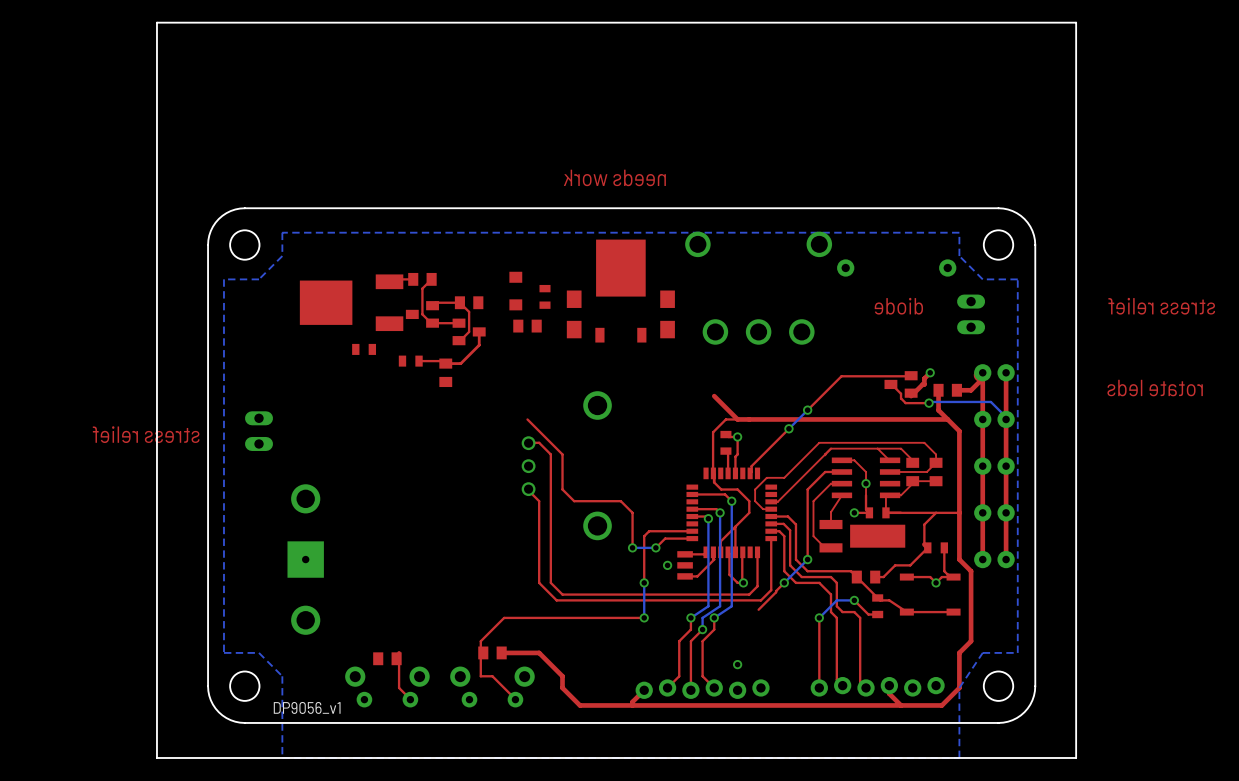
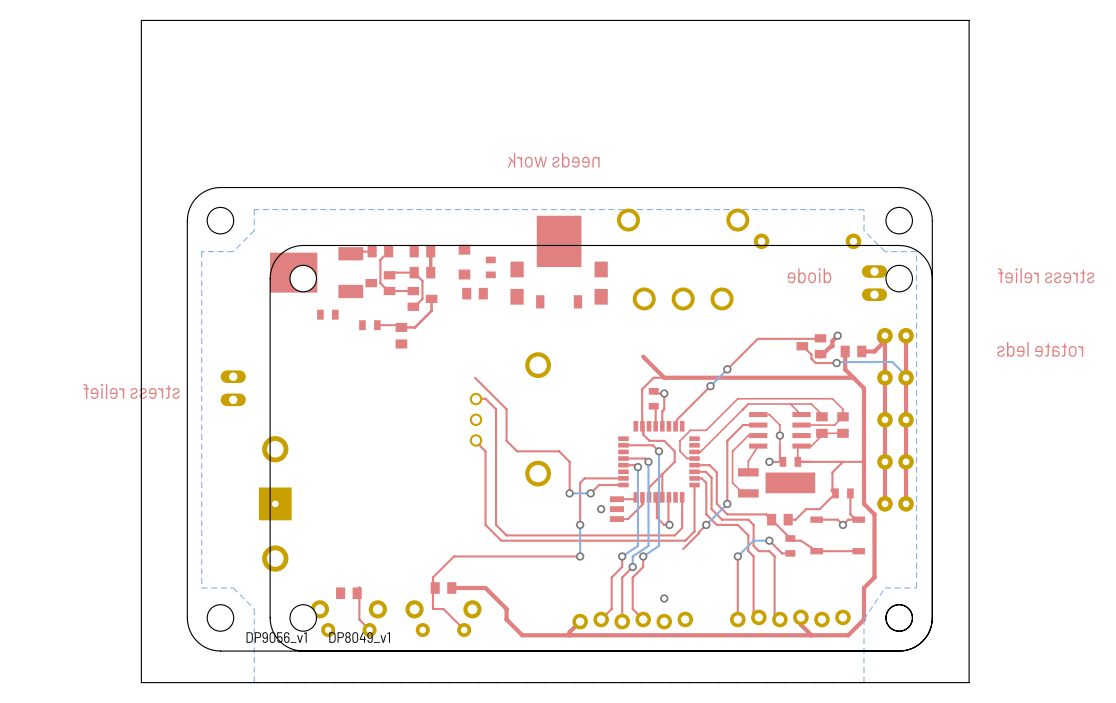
part: none -> (422, 251)
top track: none -> (430, 251) (430, 272)
part: none -> (601, 448)

